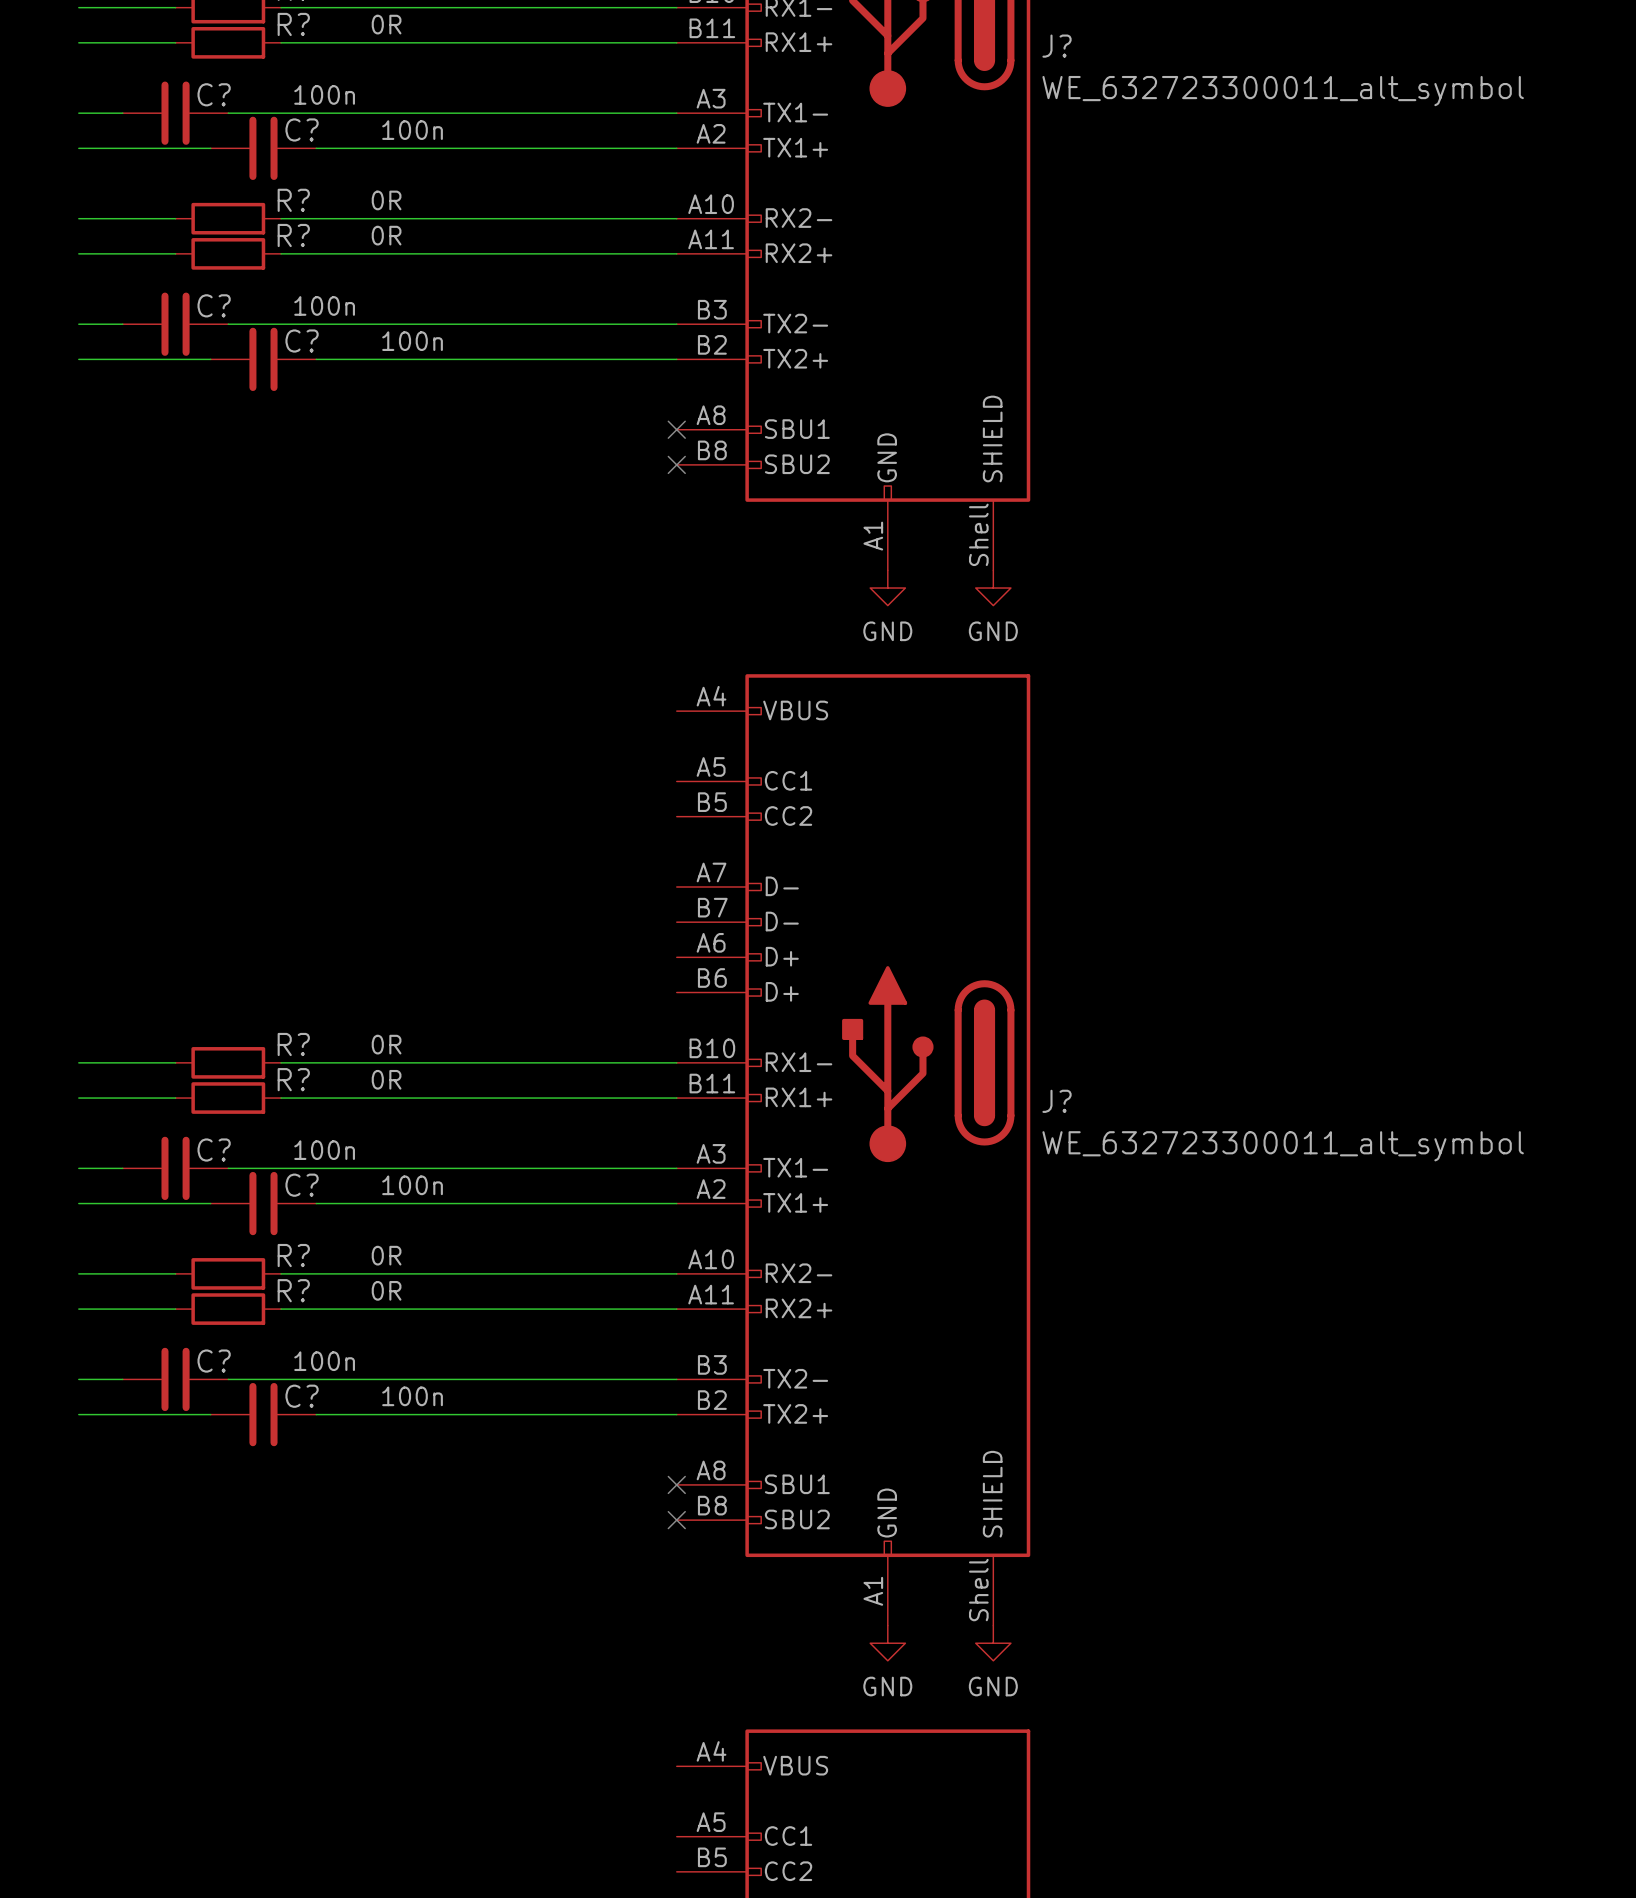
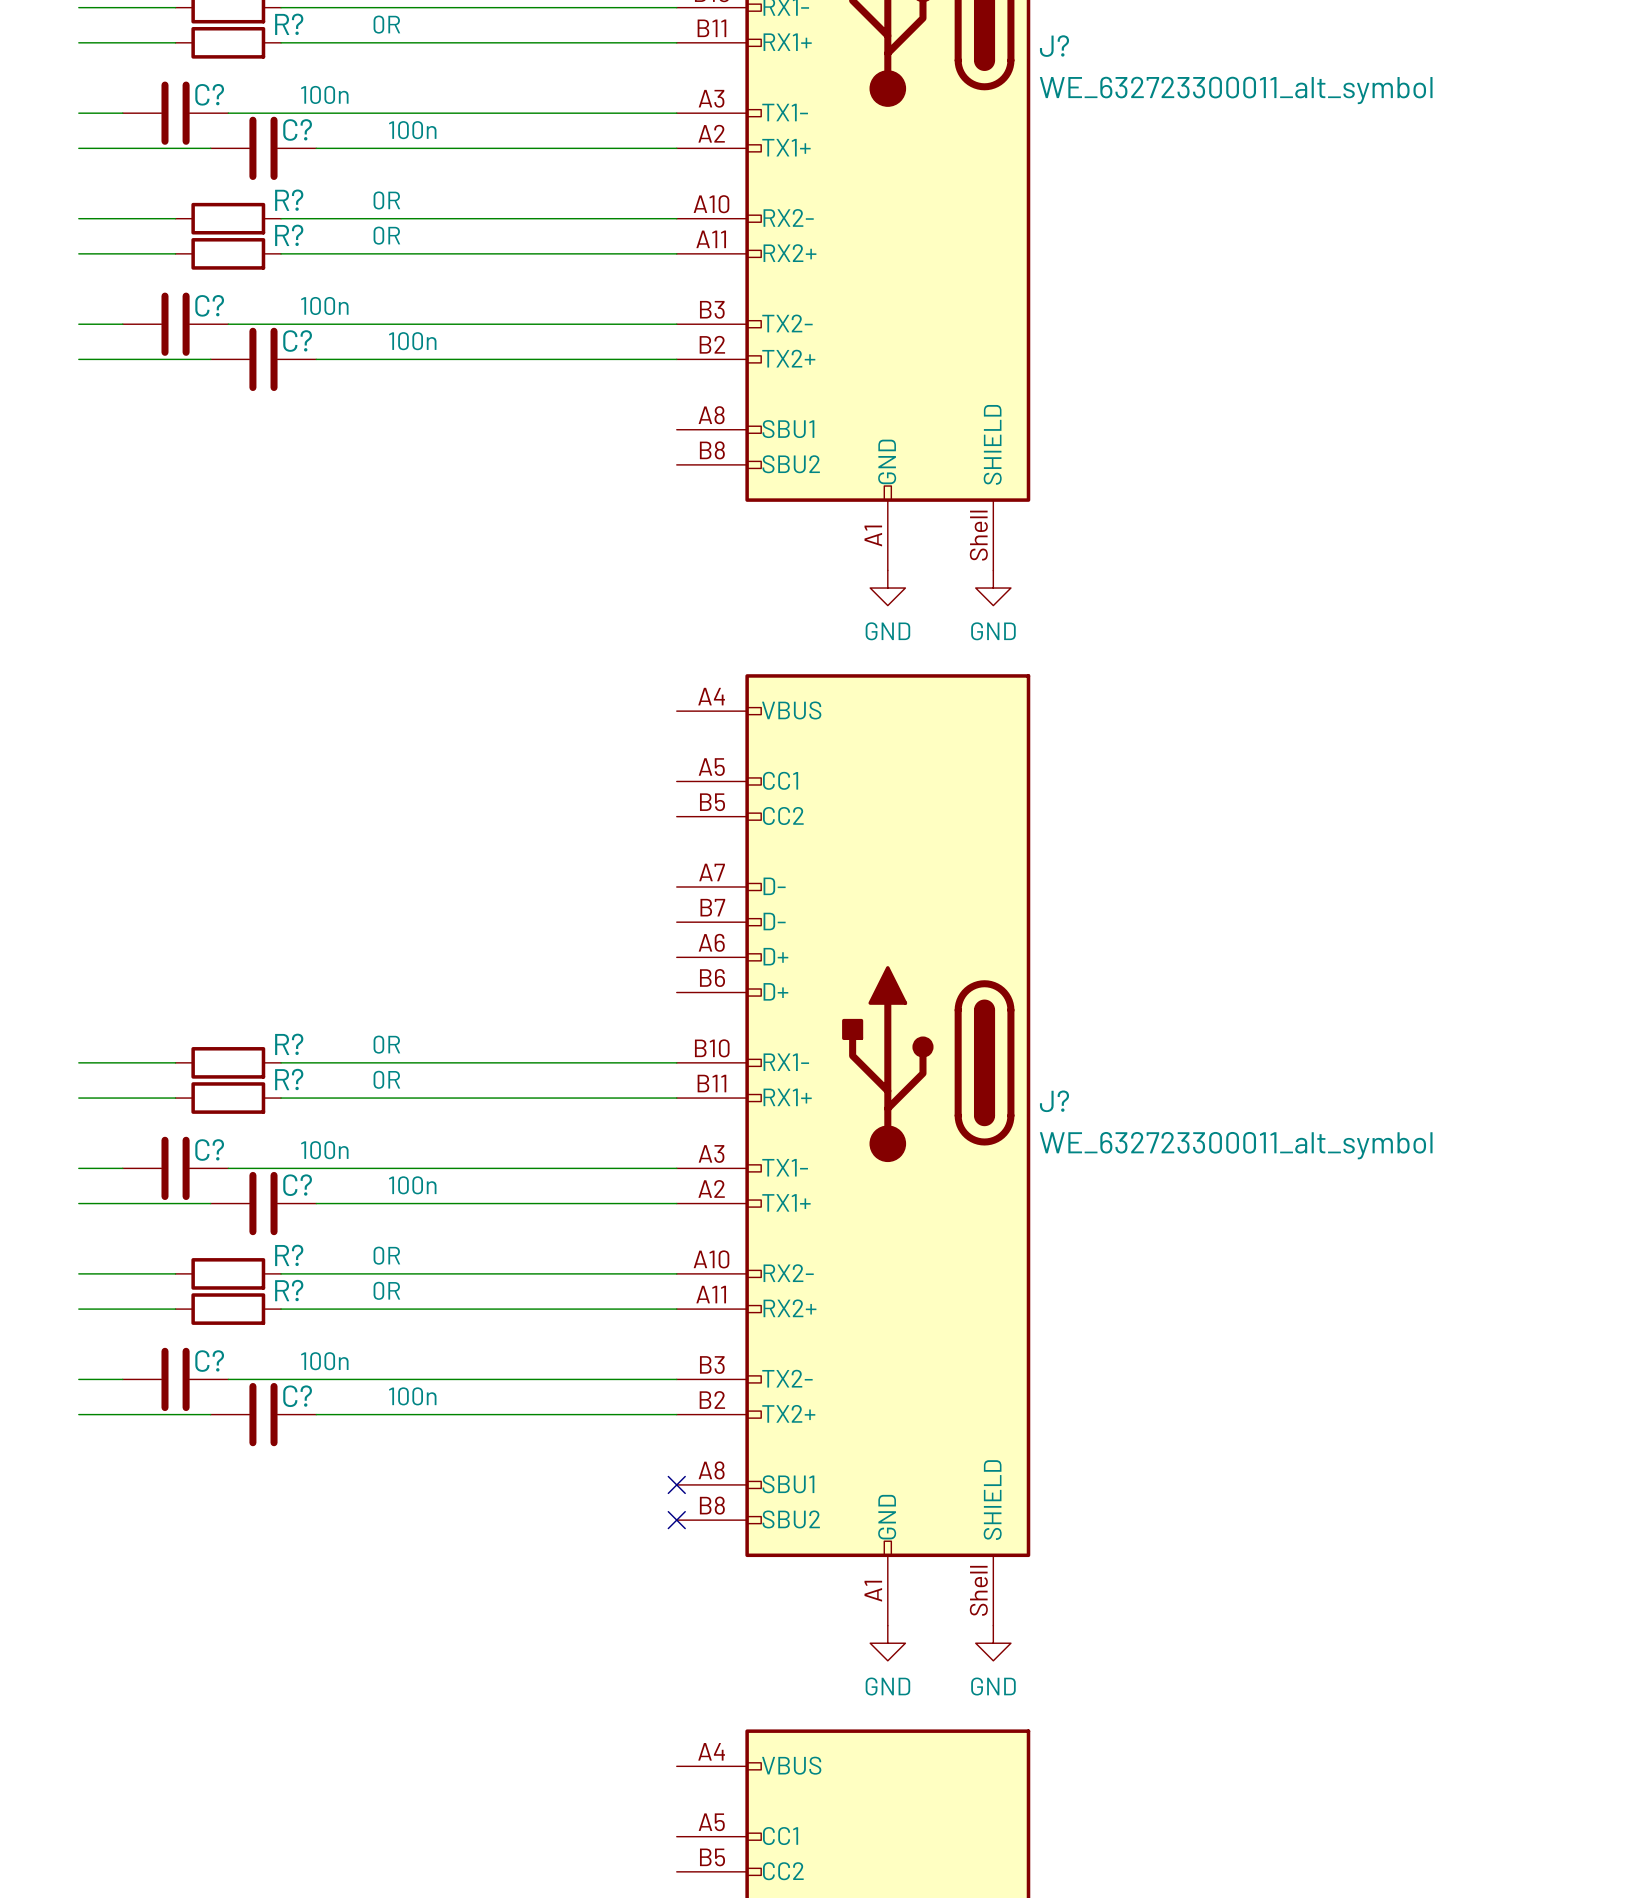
no-connect mark: (676, 429) -> none
no-connect mark: (676, 464) -> none

